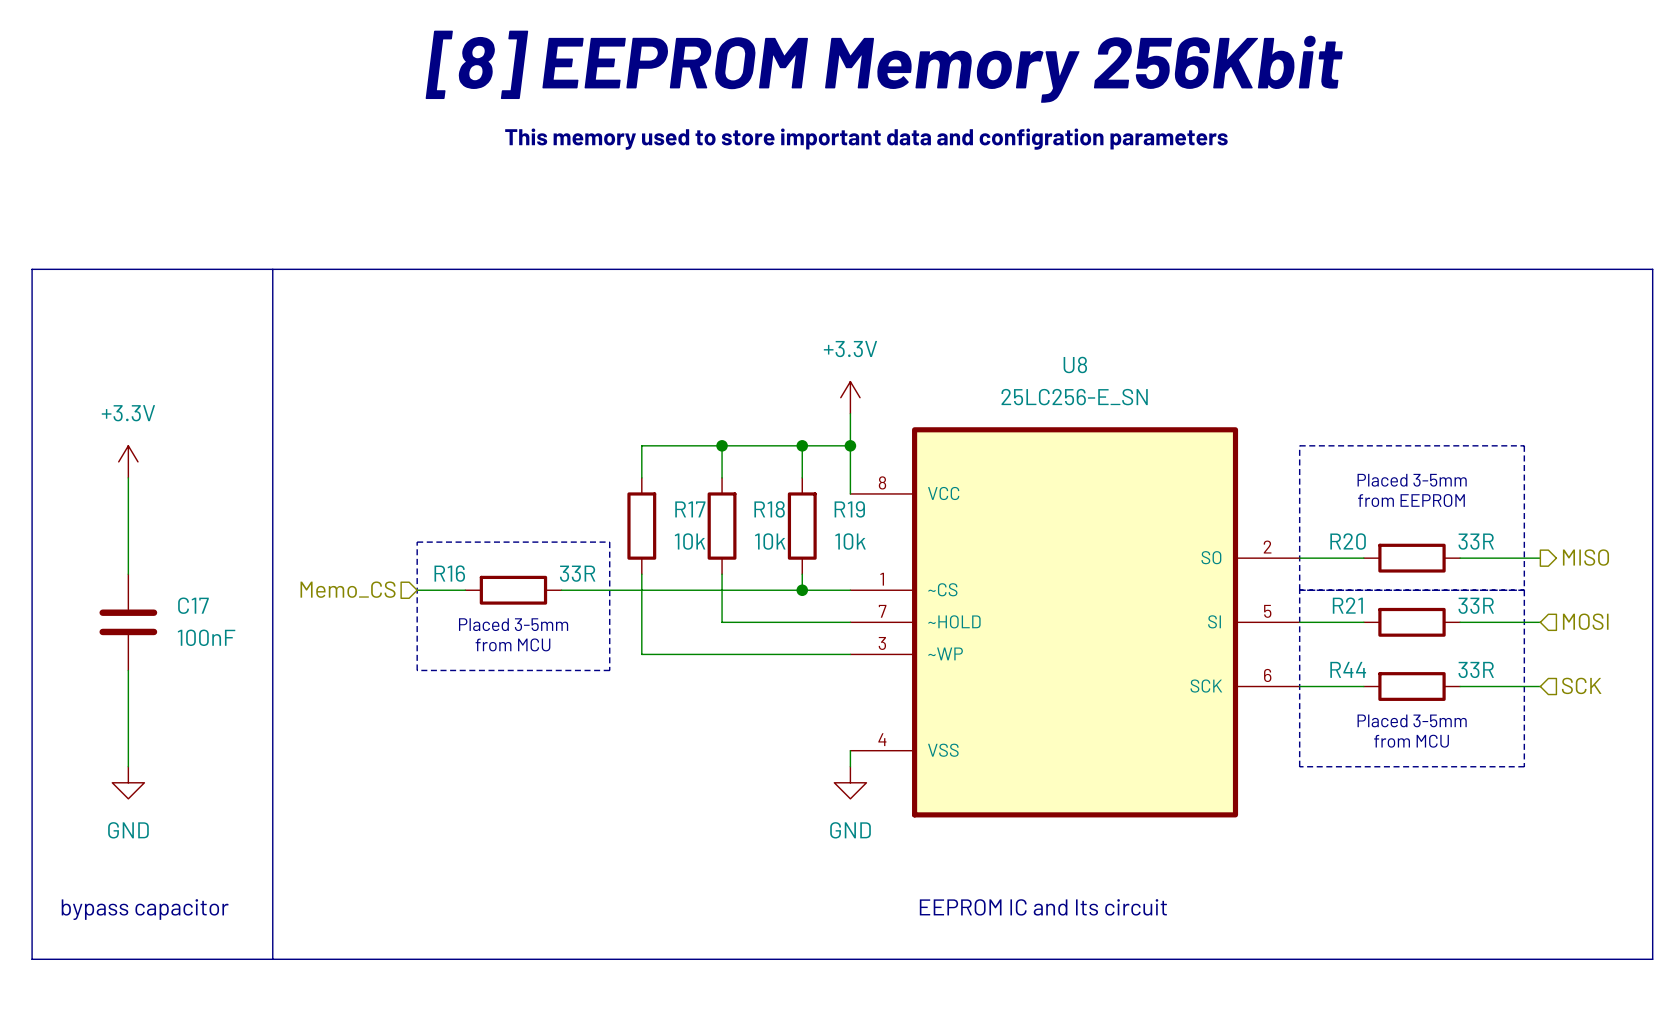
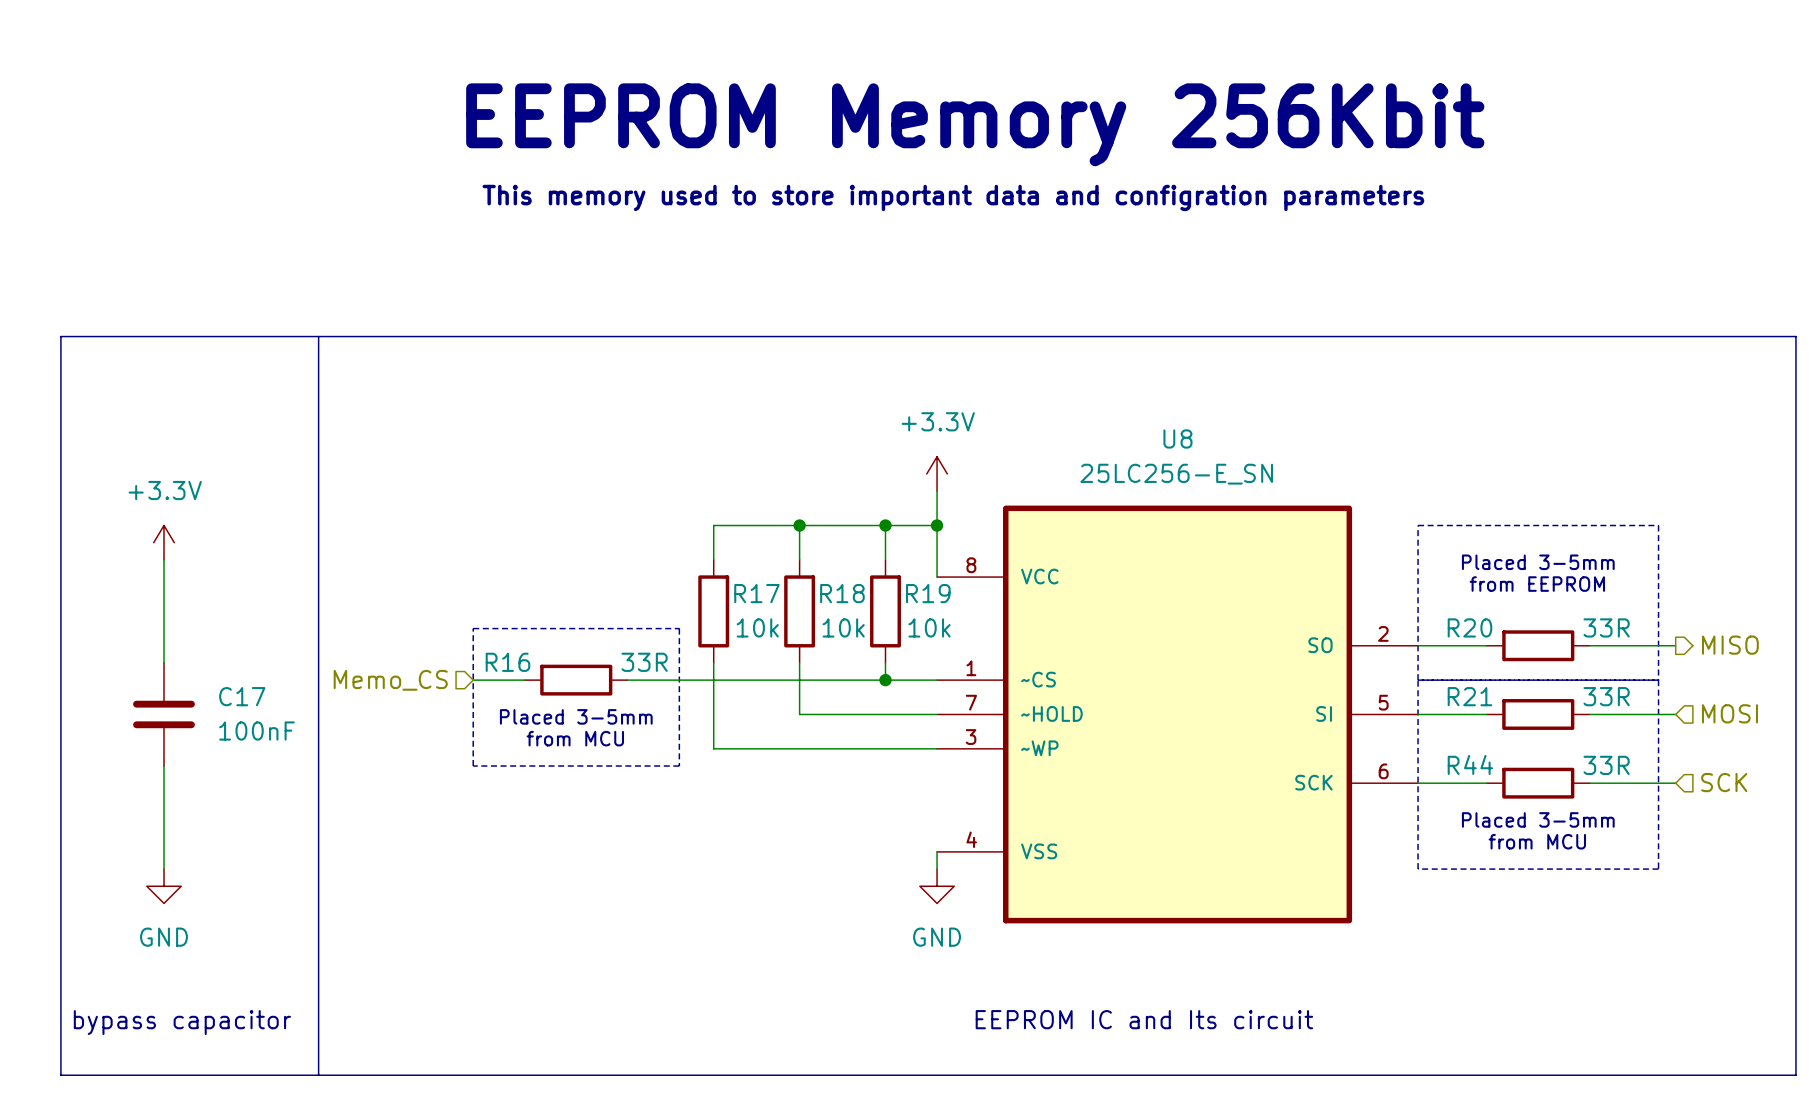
text: [8] EEPROM Memory 256Kbit (884, 66) -> EEPROM Memory 256Kbit (975, 124)

